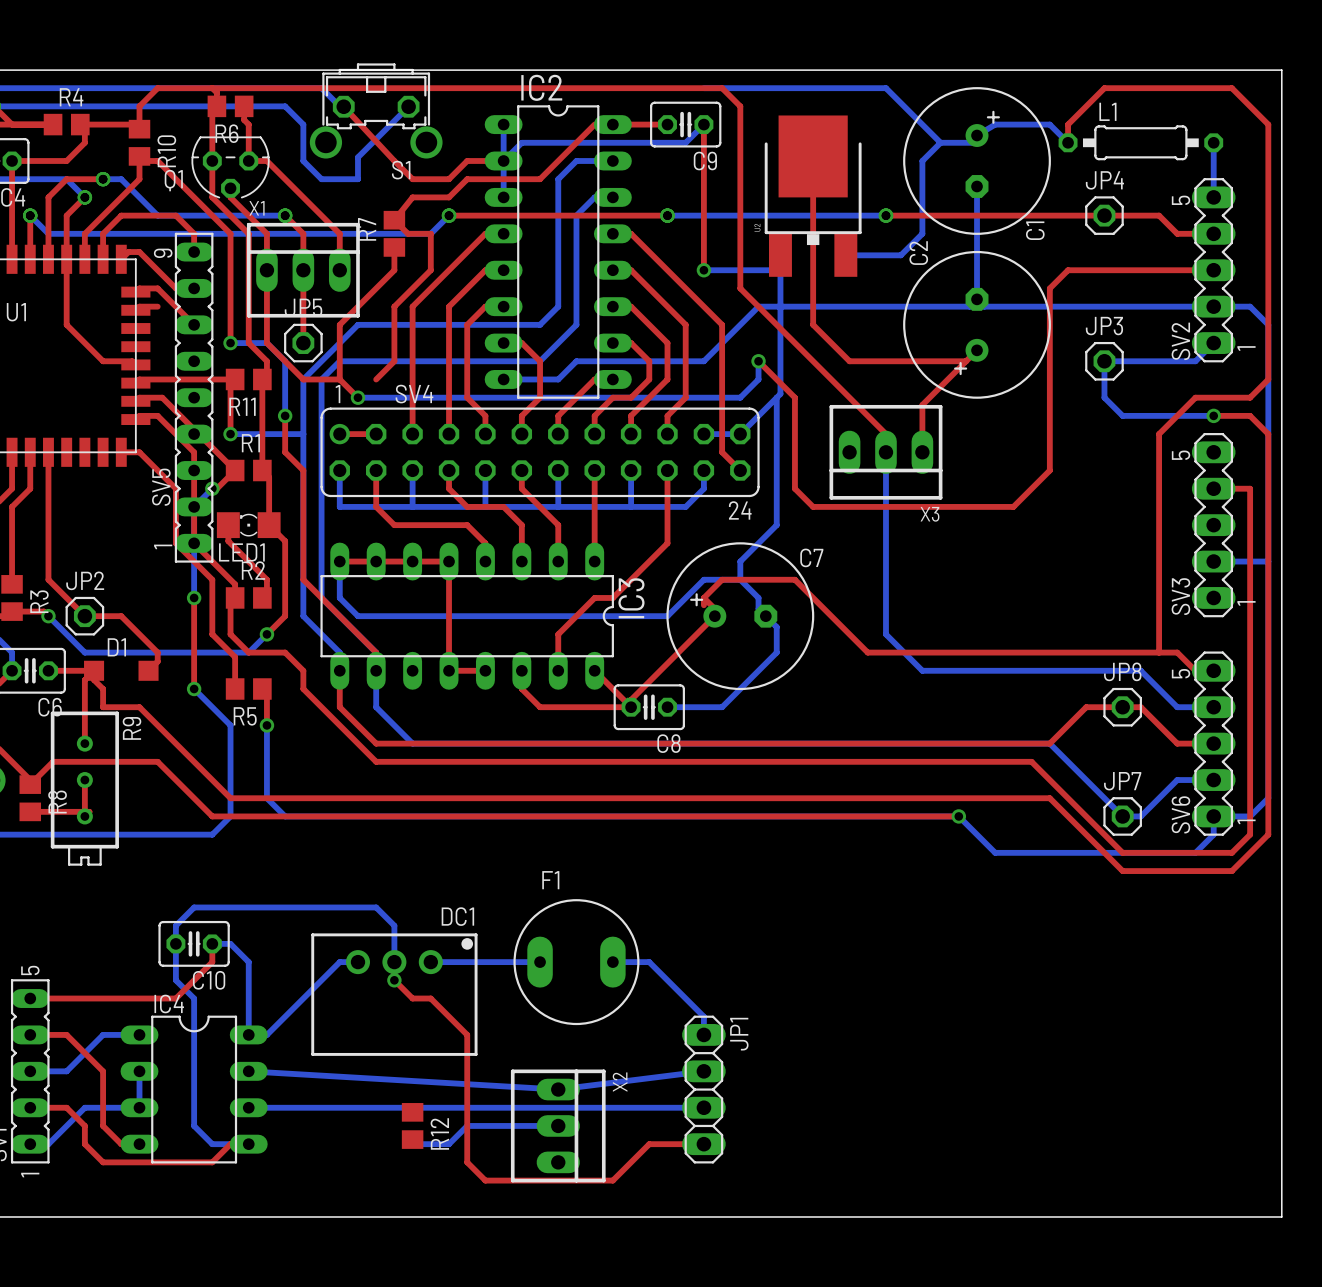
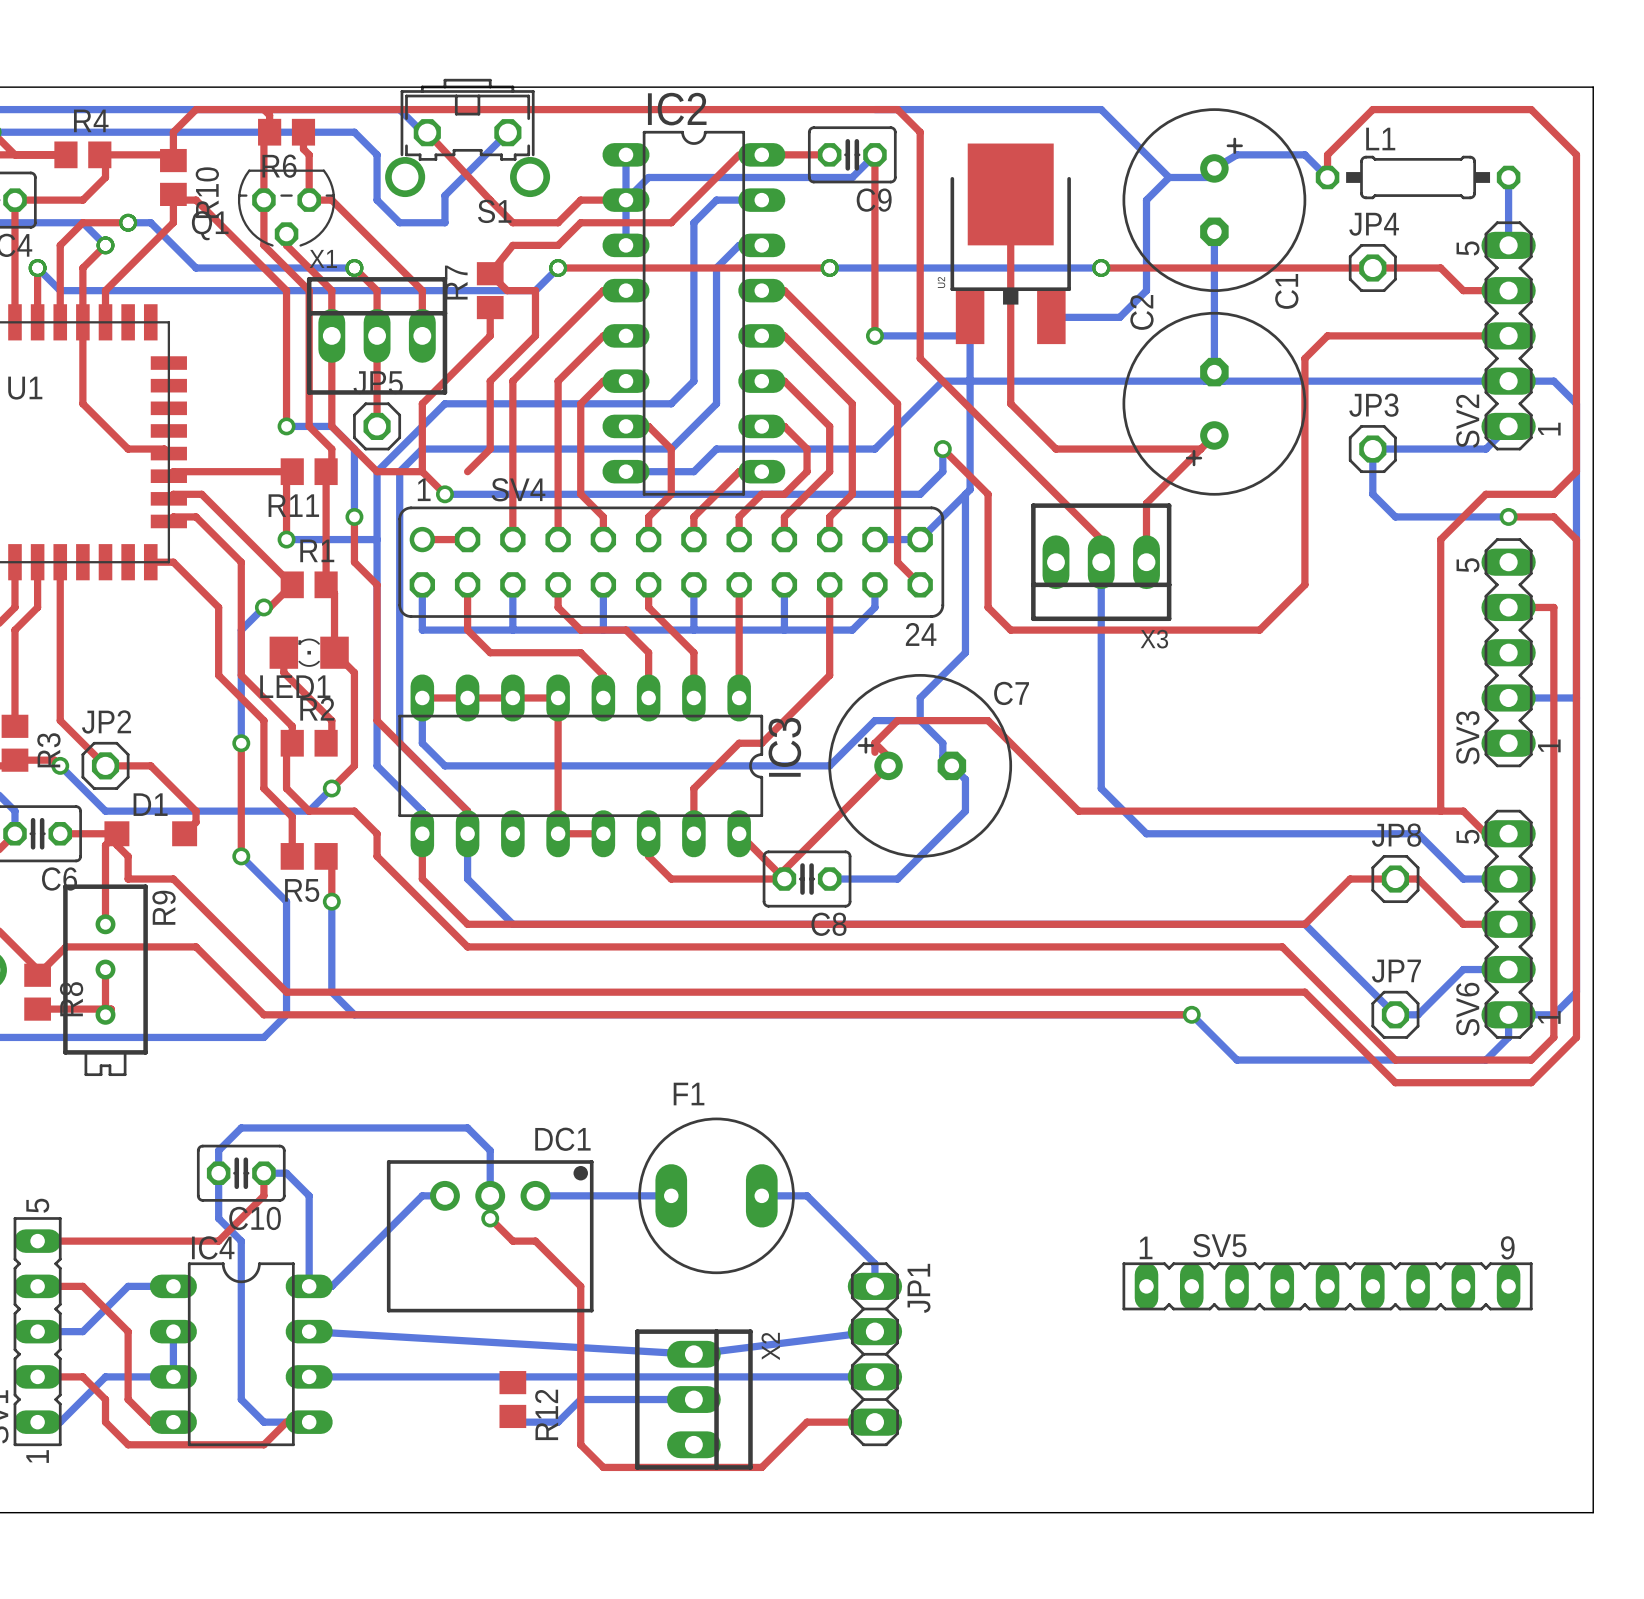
top track: (194, 252) (194, 233) (175, 215) (121, 215) (103, 233) (103, 259) -> none
top track: (121, 259) (128, 252) (139, 252) (175, 288) (194, 288) -> none
top track: (135, 292) (139, 288) (157, 288) (194, 324) -> none
top track: (157, 306) (139, 306) (135, 310) -> none
SV5 rotation: 0° (194, 397) -> 90° clockwise (1327, 1286)
SV5 position: (194, 397) -> (1327, 1286)

